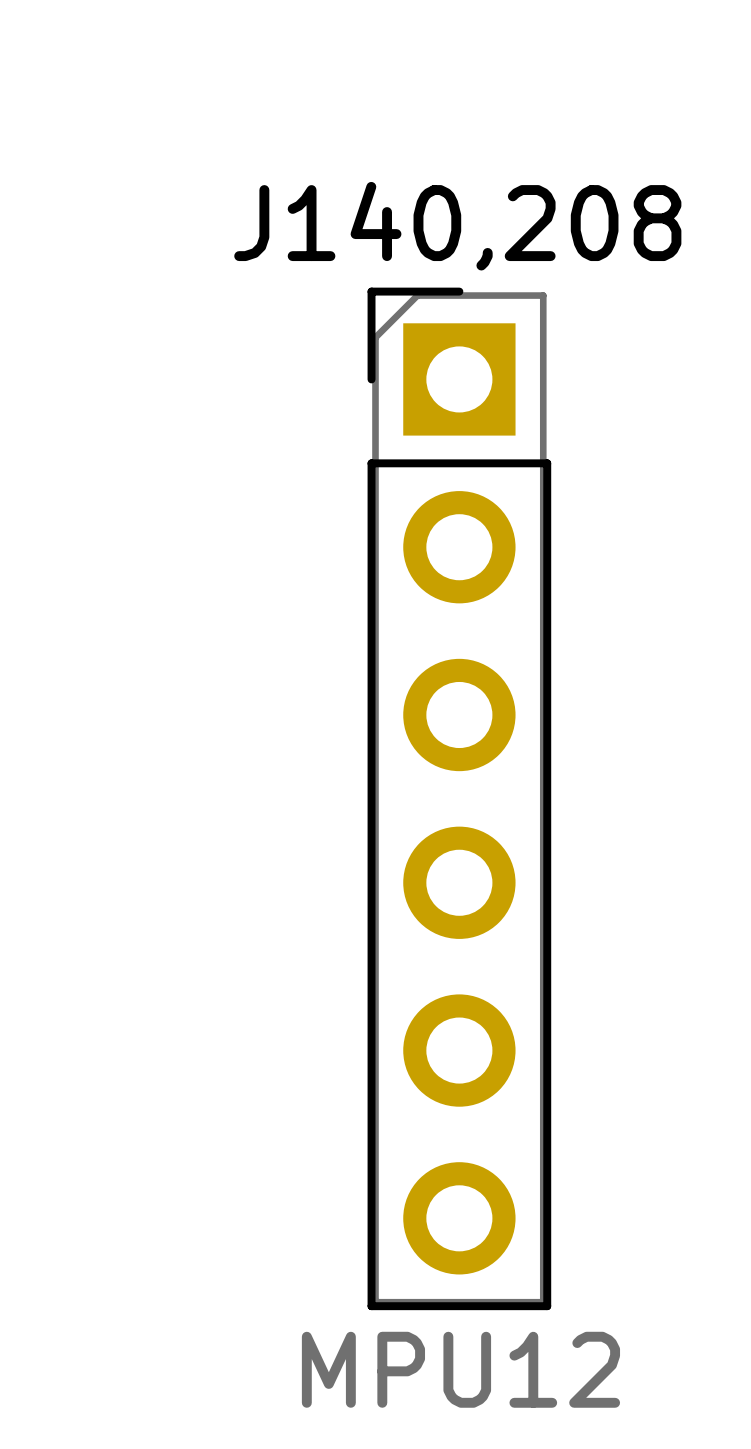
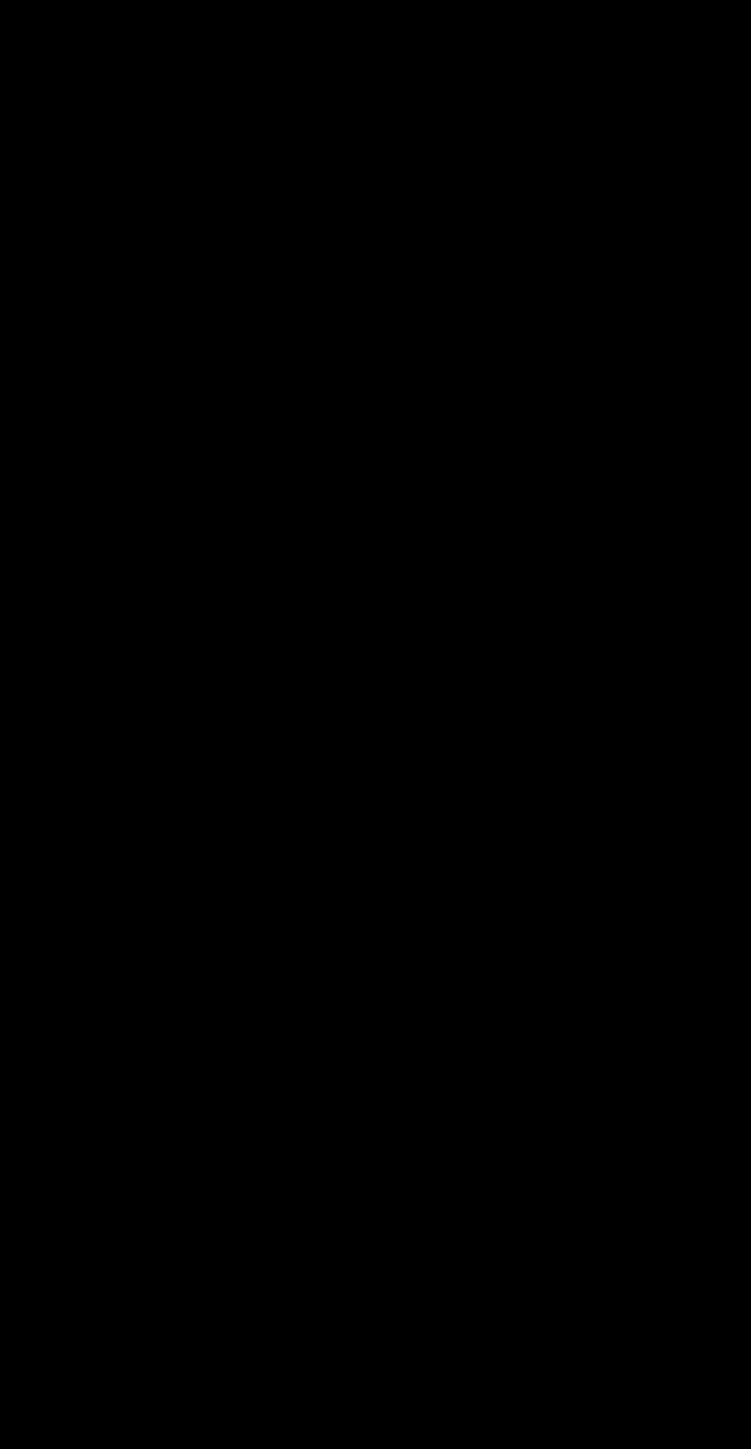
J140,208: MPU12 (459, 798) -> none

